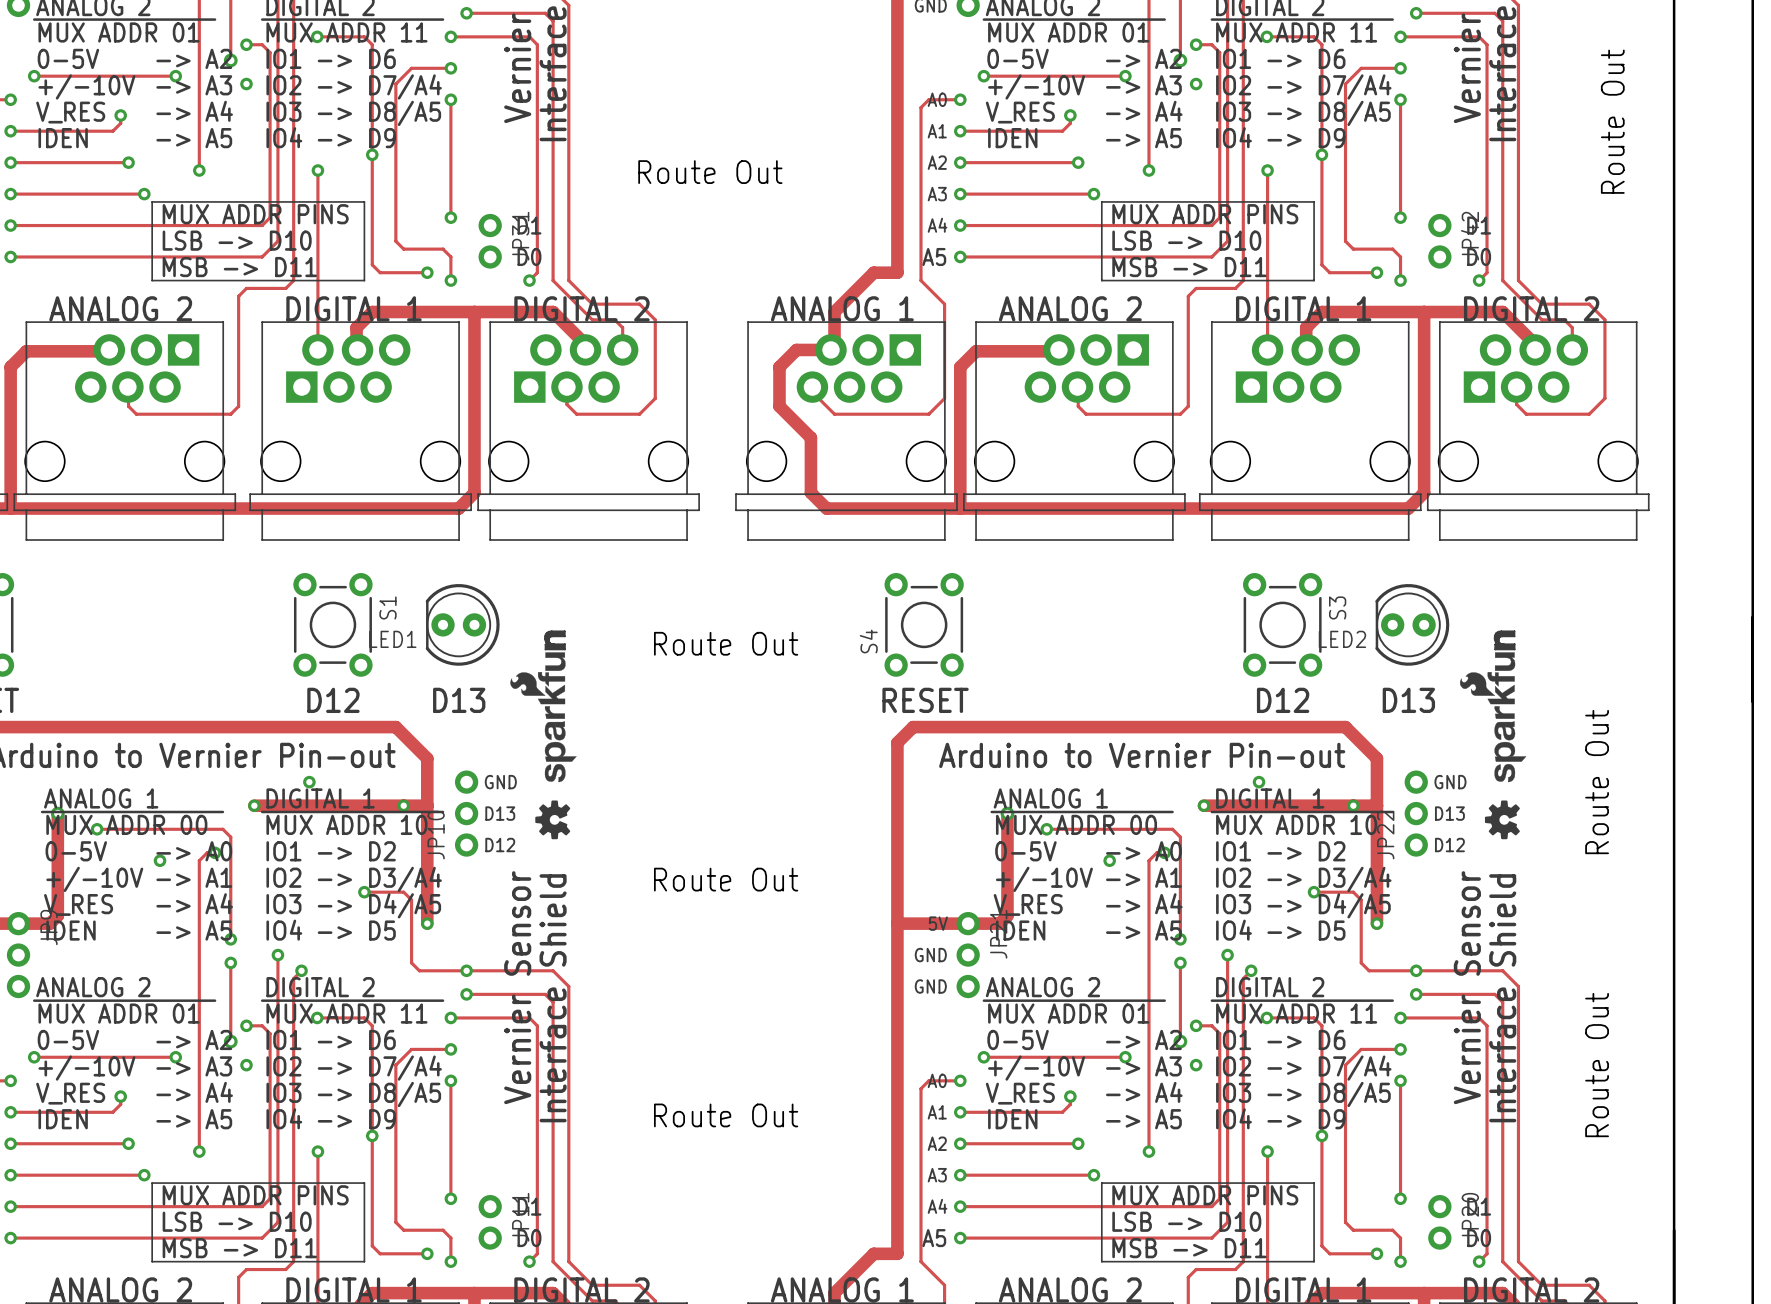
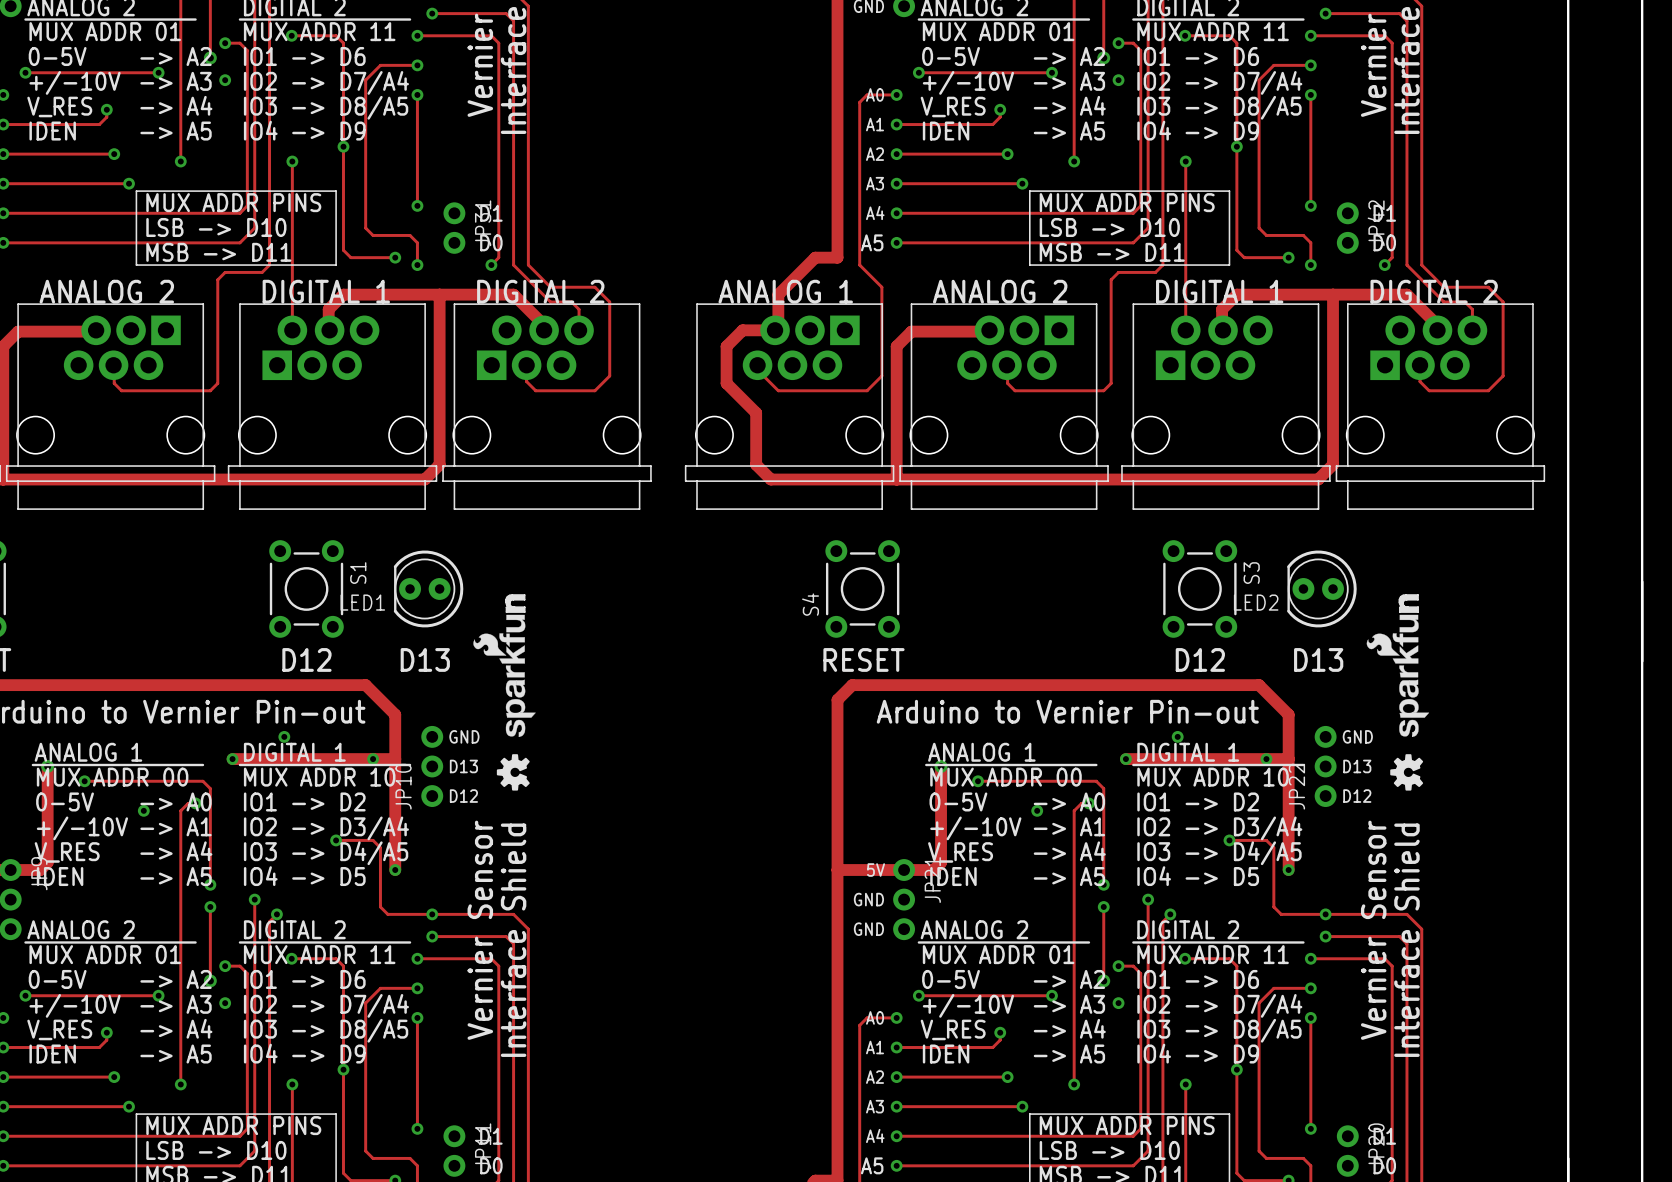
text: Route Out (1612, 121) -> none
text: Route Out (710, 172) -> none
text: Route Out (726, 643) -> none
text: Route Out (1597, 782) -> none
text: Route Out (726, 879) -> none
text: Route Out (1597, 1065) -> none
text: Route Out (726, 1115) -> none

